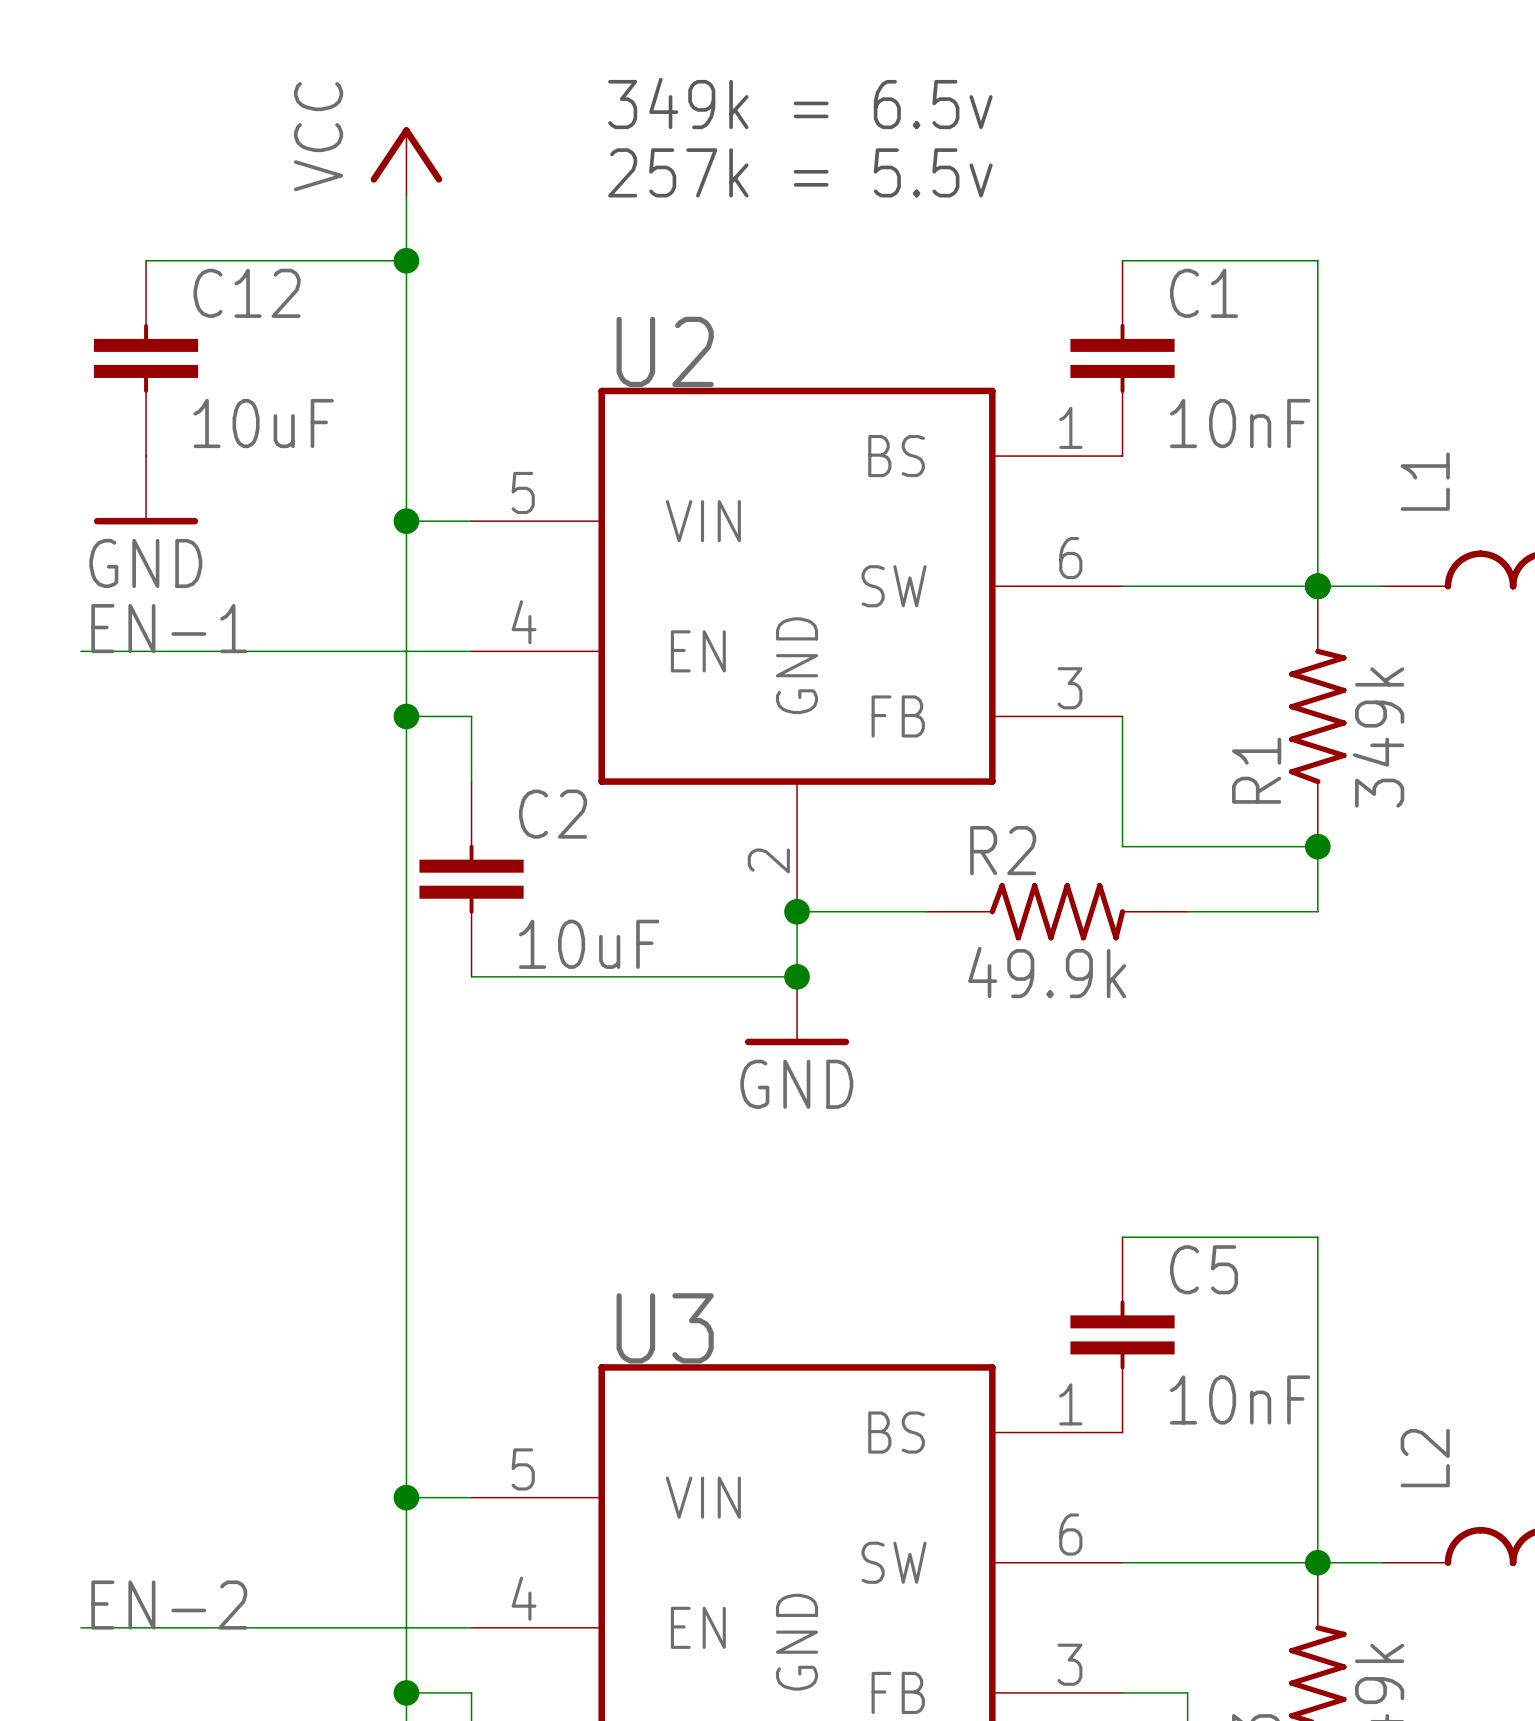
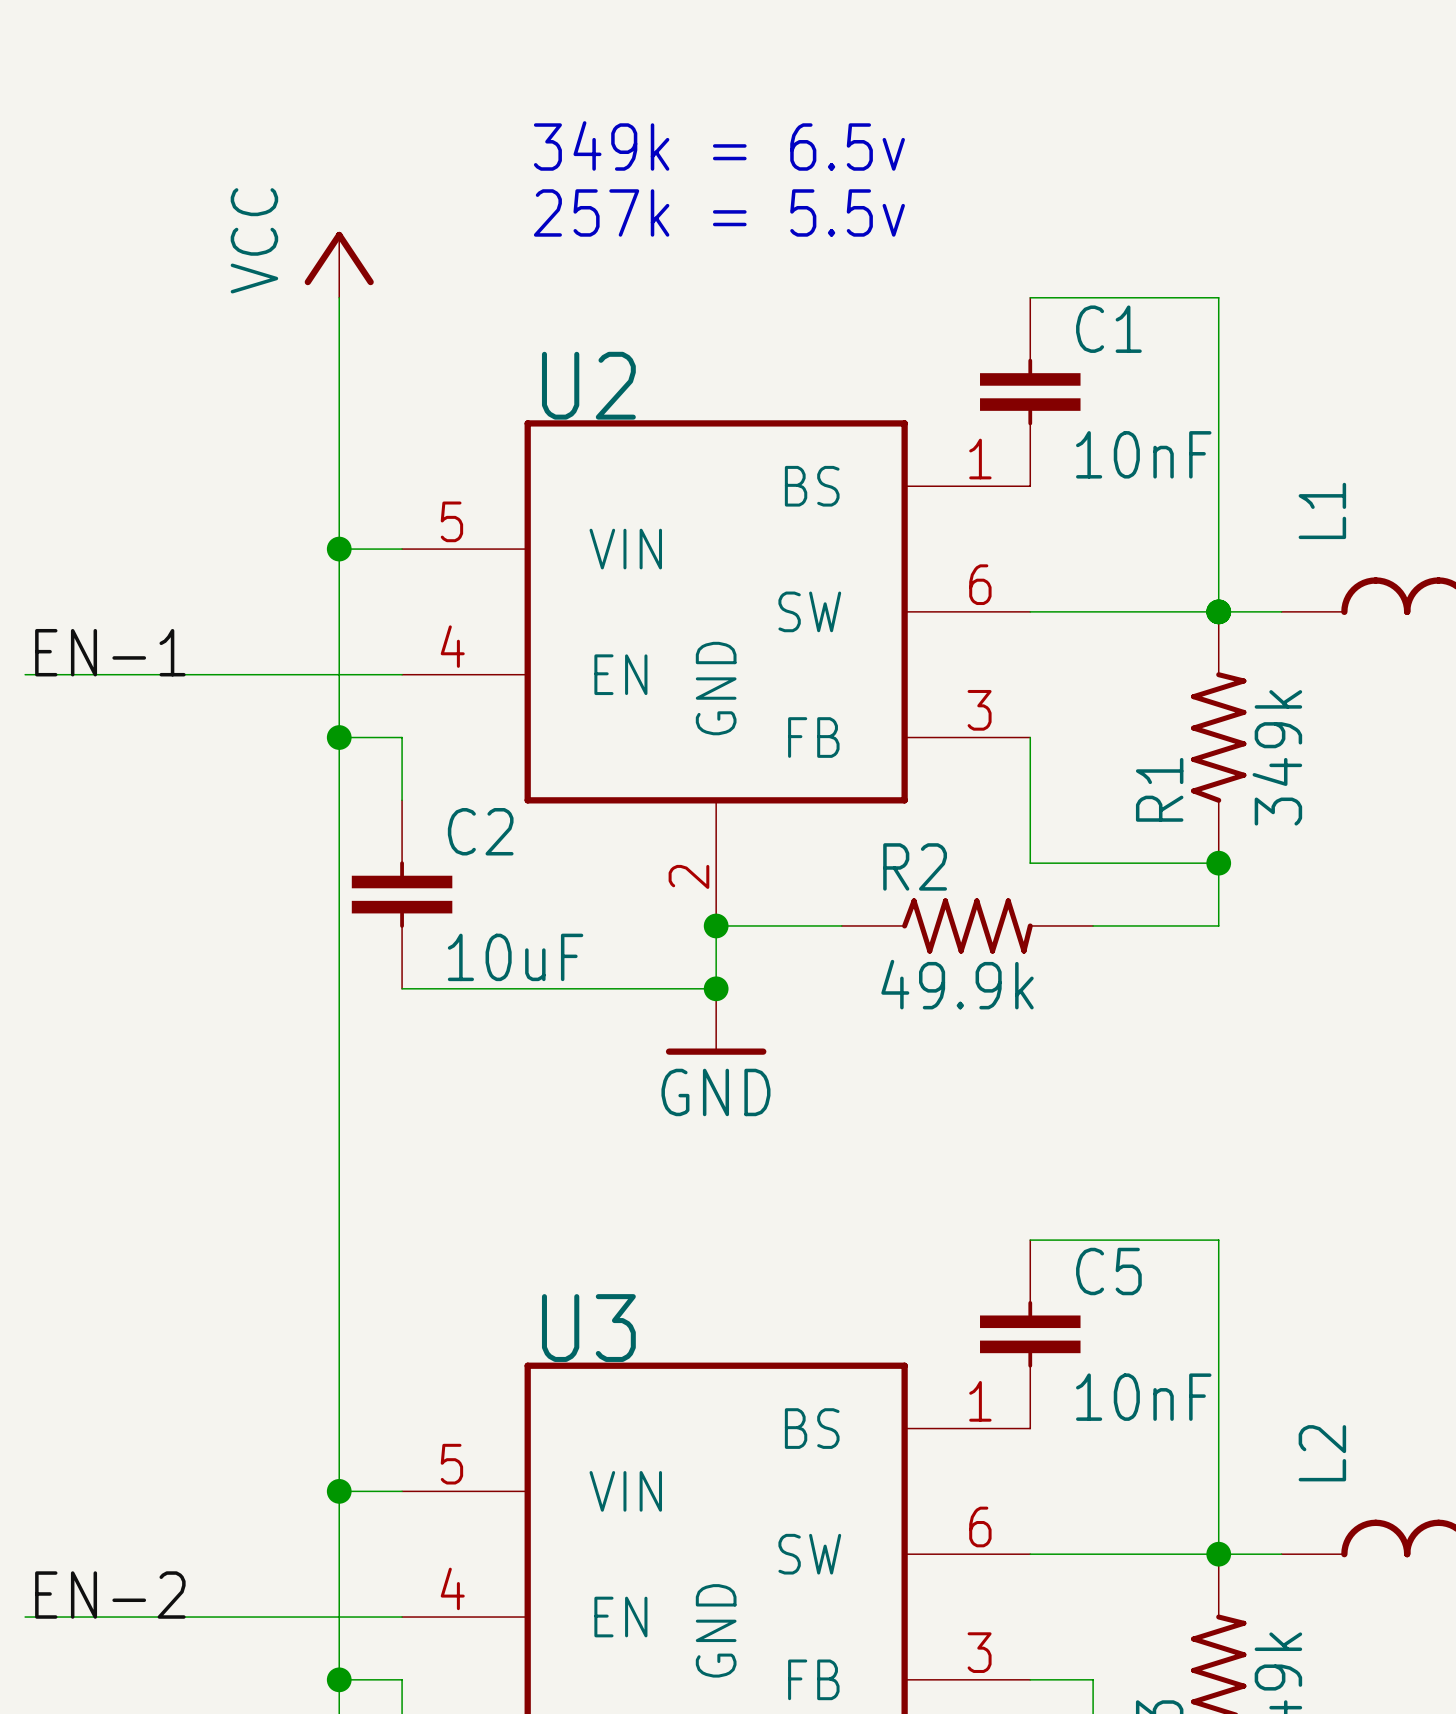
power symbol position: VCC (406, 161) -> VCC (339, 264)
wire: (406, 195) (406, 260) (146, 260) -> none
junction: (406, 260) -> none
C12: 10uF (146, 358) -> none
power symbol: GND (146, 490) -> none

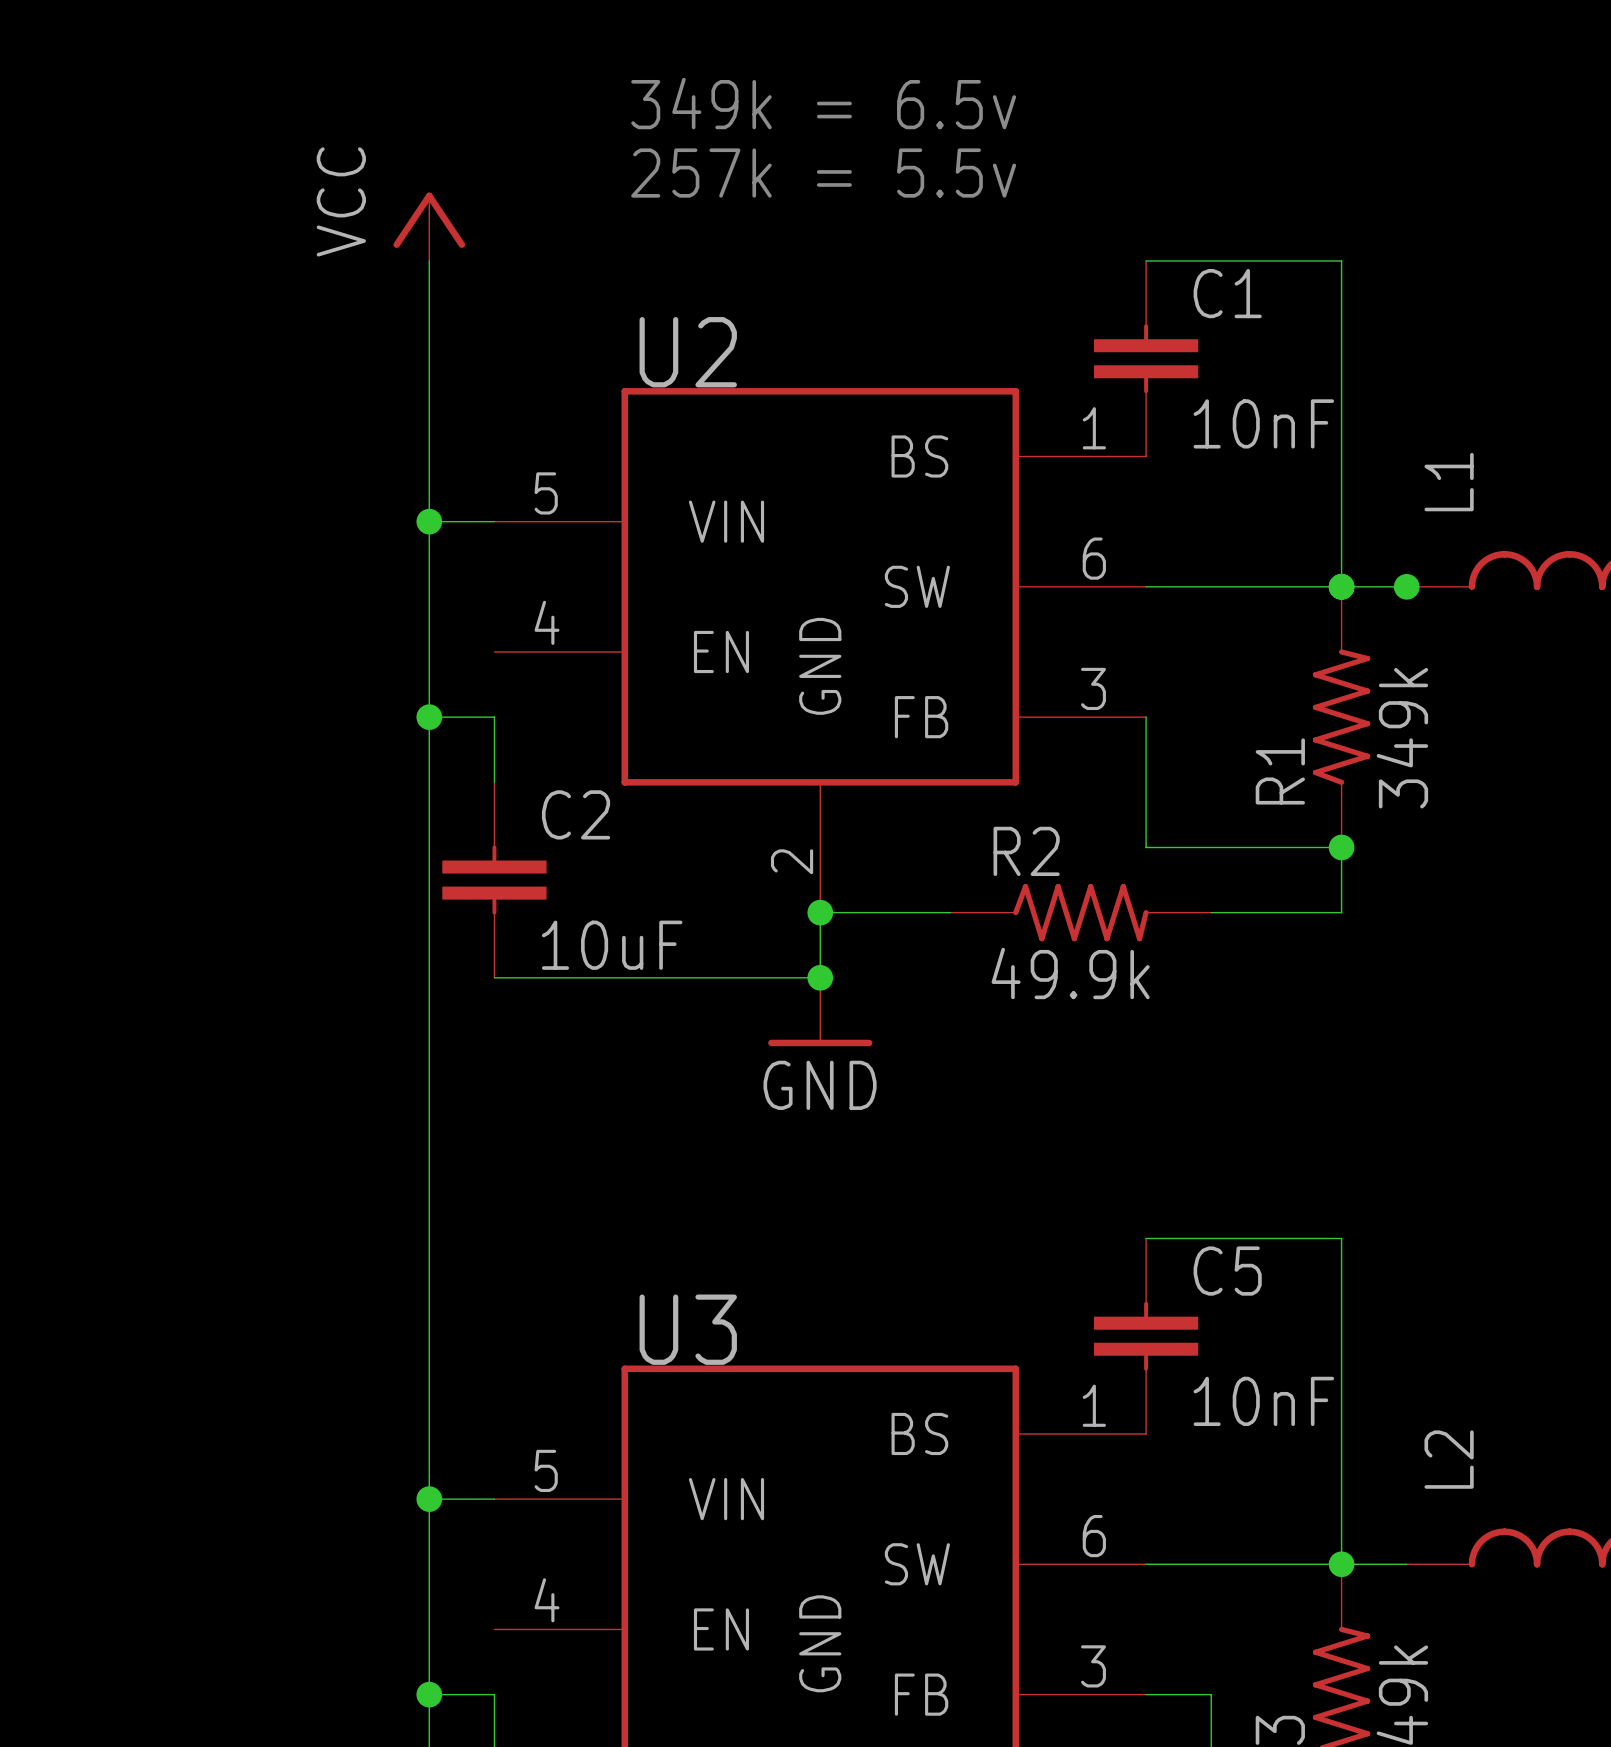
junction: none -> (1406, 586)
label: EN-1 (110, 652) -> none
wire: (25, 674) (402, 674) -> none
label: EN-2 (110, 1595) -> none
wire: (25, 1617) (402, 1617) -> none

